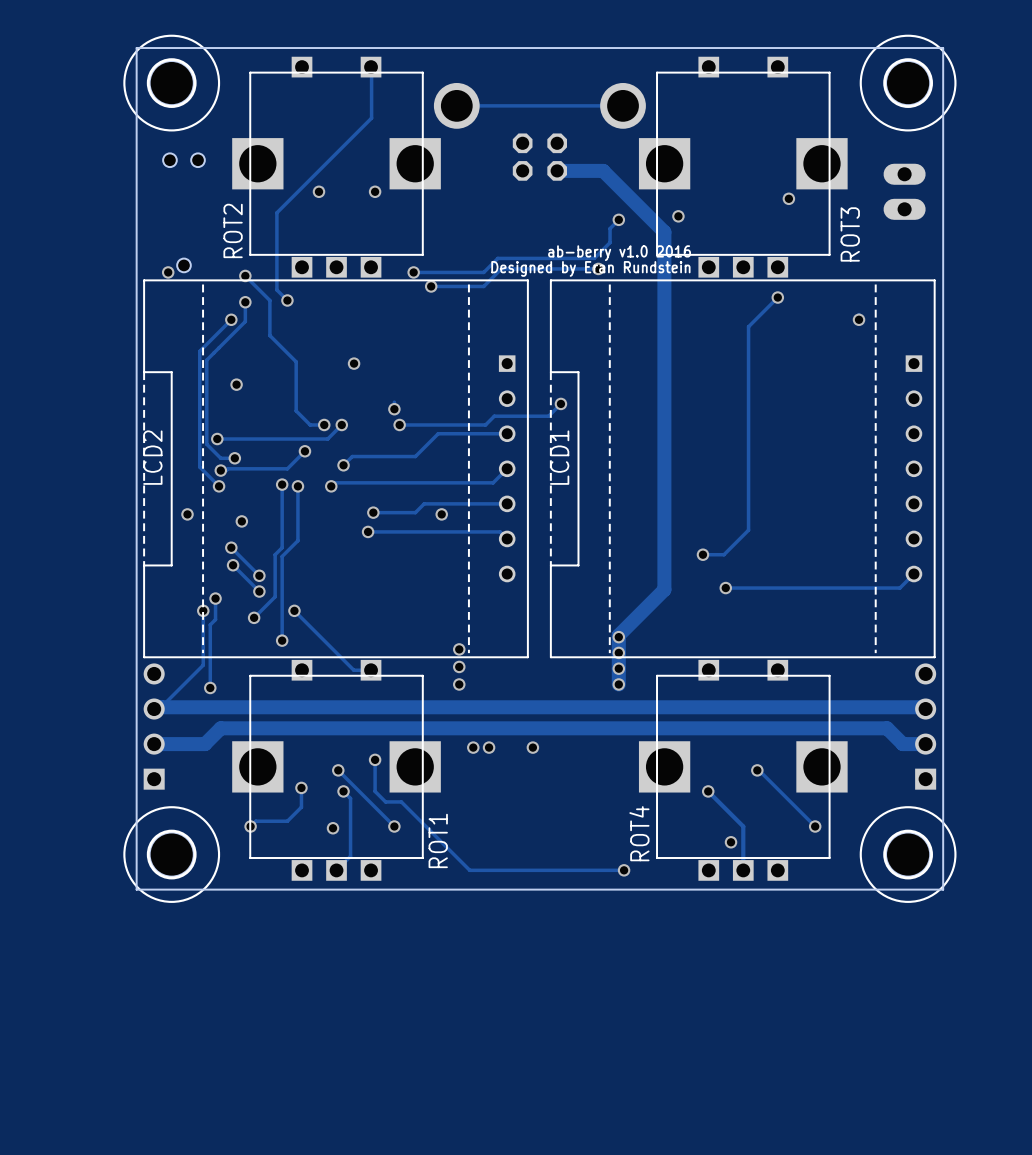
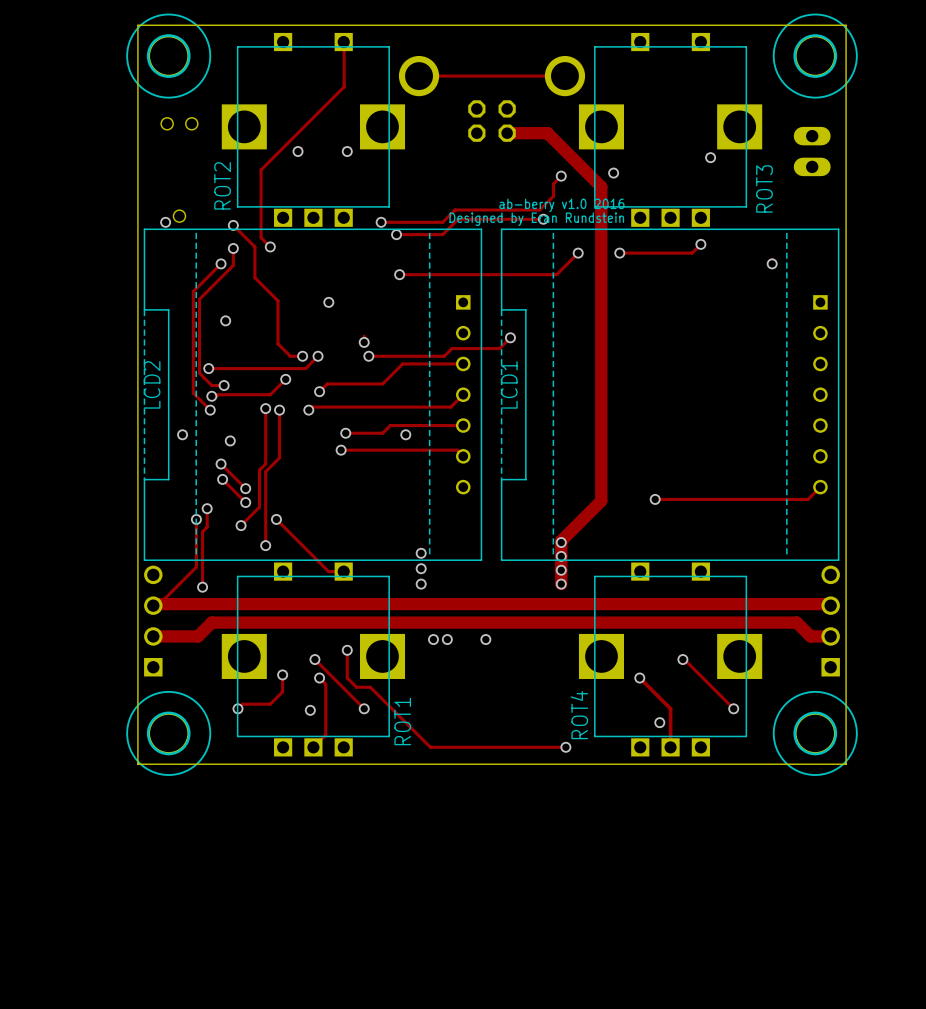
track: none -> (578, 253) (556, 274) (399, 274)
via: none -> (578, 253)
via: none -> (619, 253)
track: (767, 307) (748, 326) (748, 530) (724, 554) (702, 554) -> (692, 253) (619, 253)
via: none -> (399, 274)
via: (702, 554) -> none

